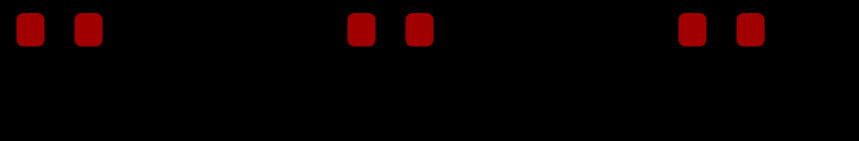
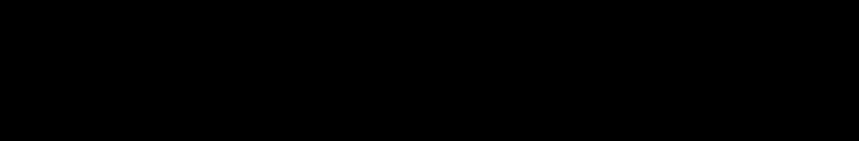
part: (59, 29) -> none
part: (390, 29) -> none
part: (721, 29) -> none

